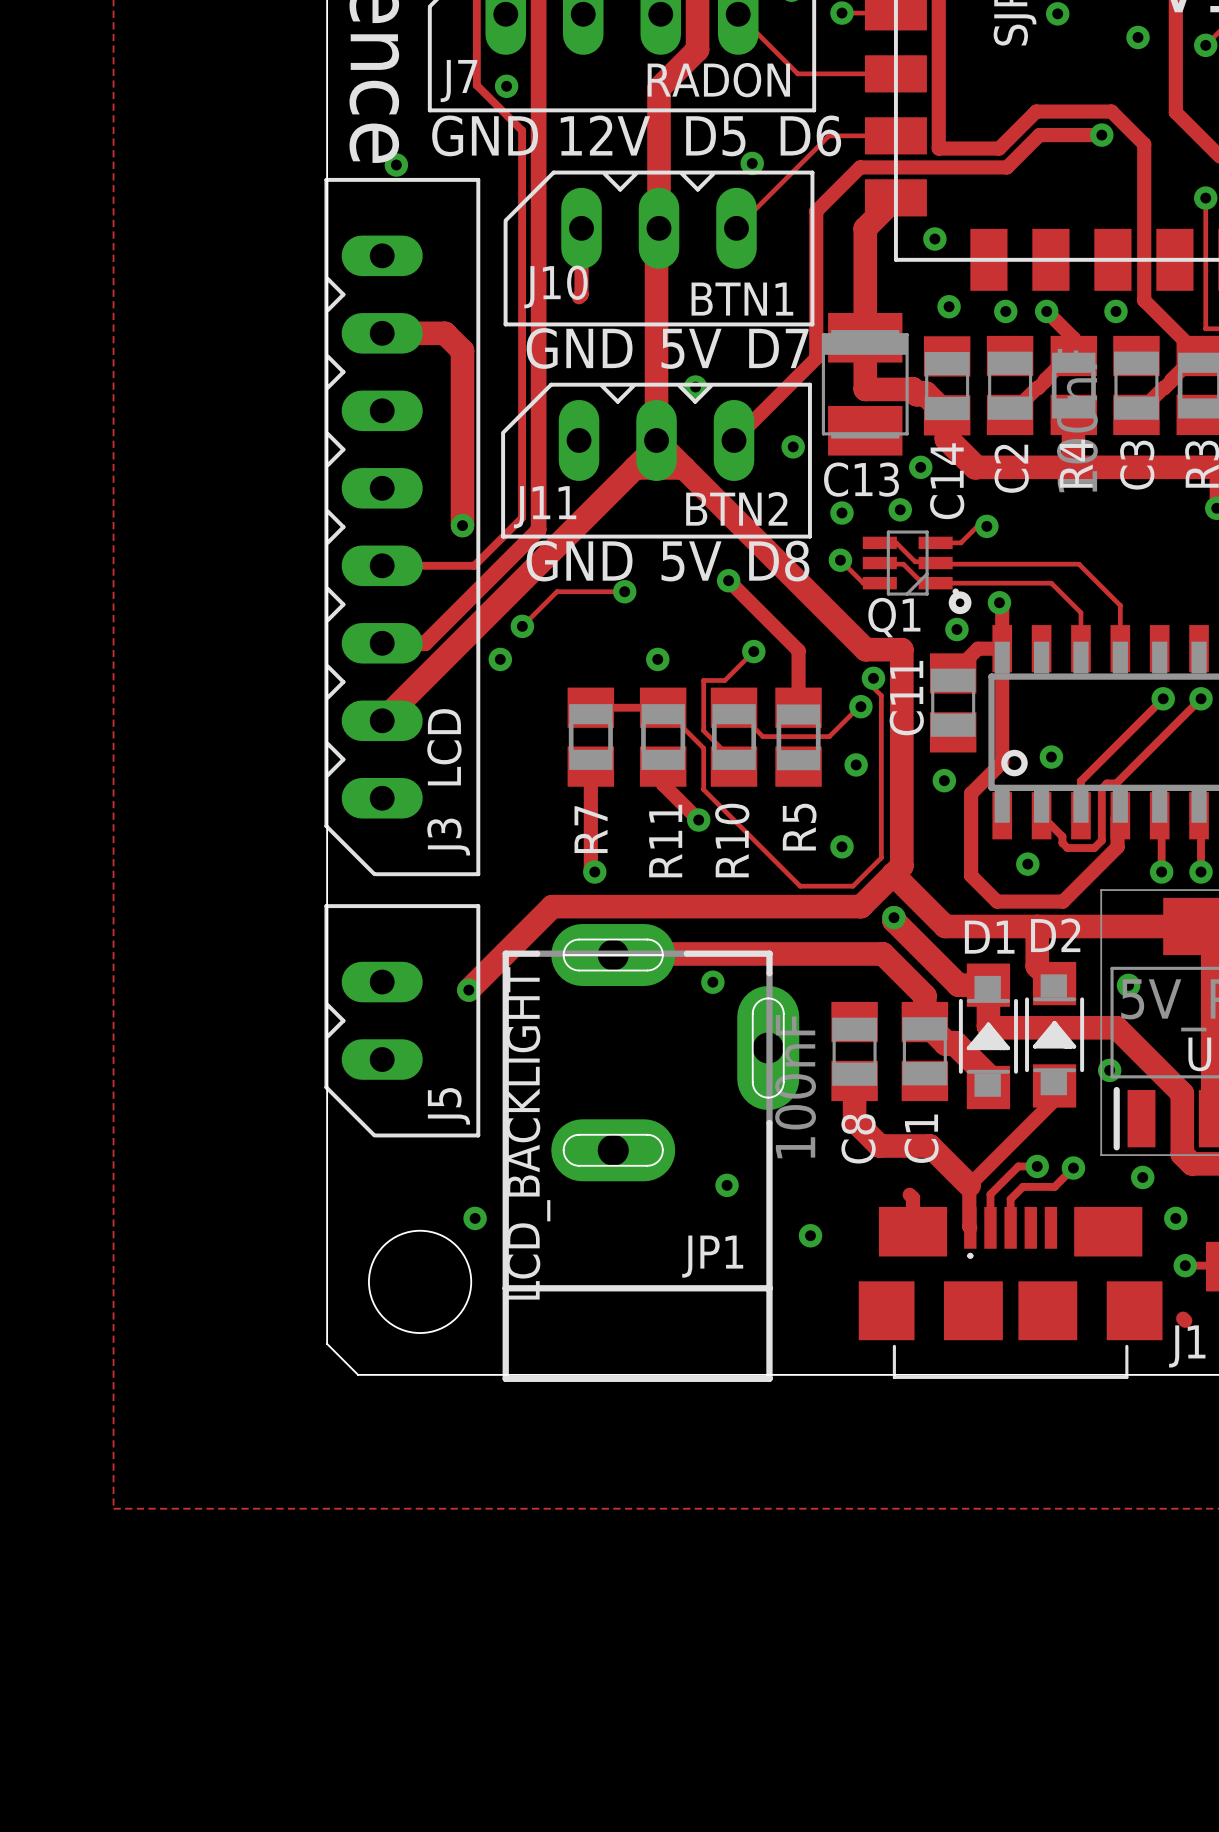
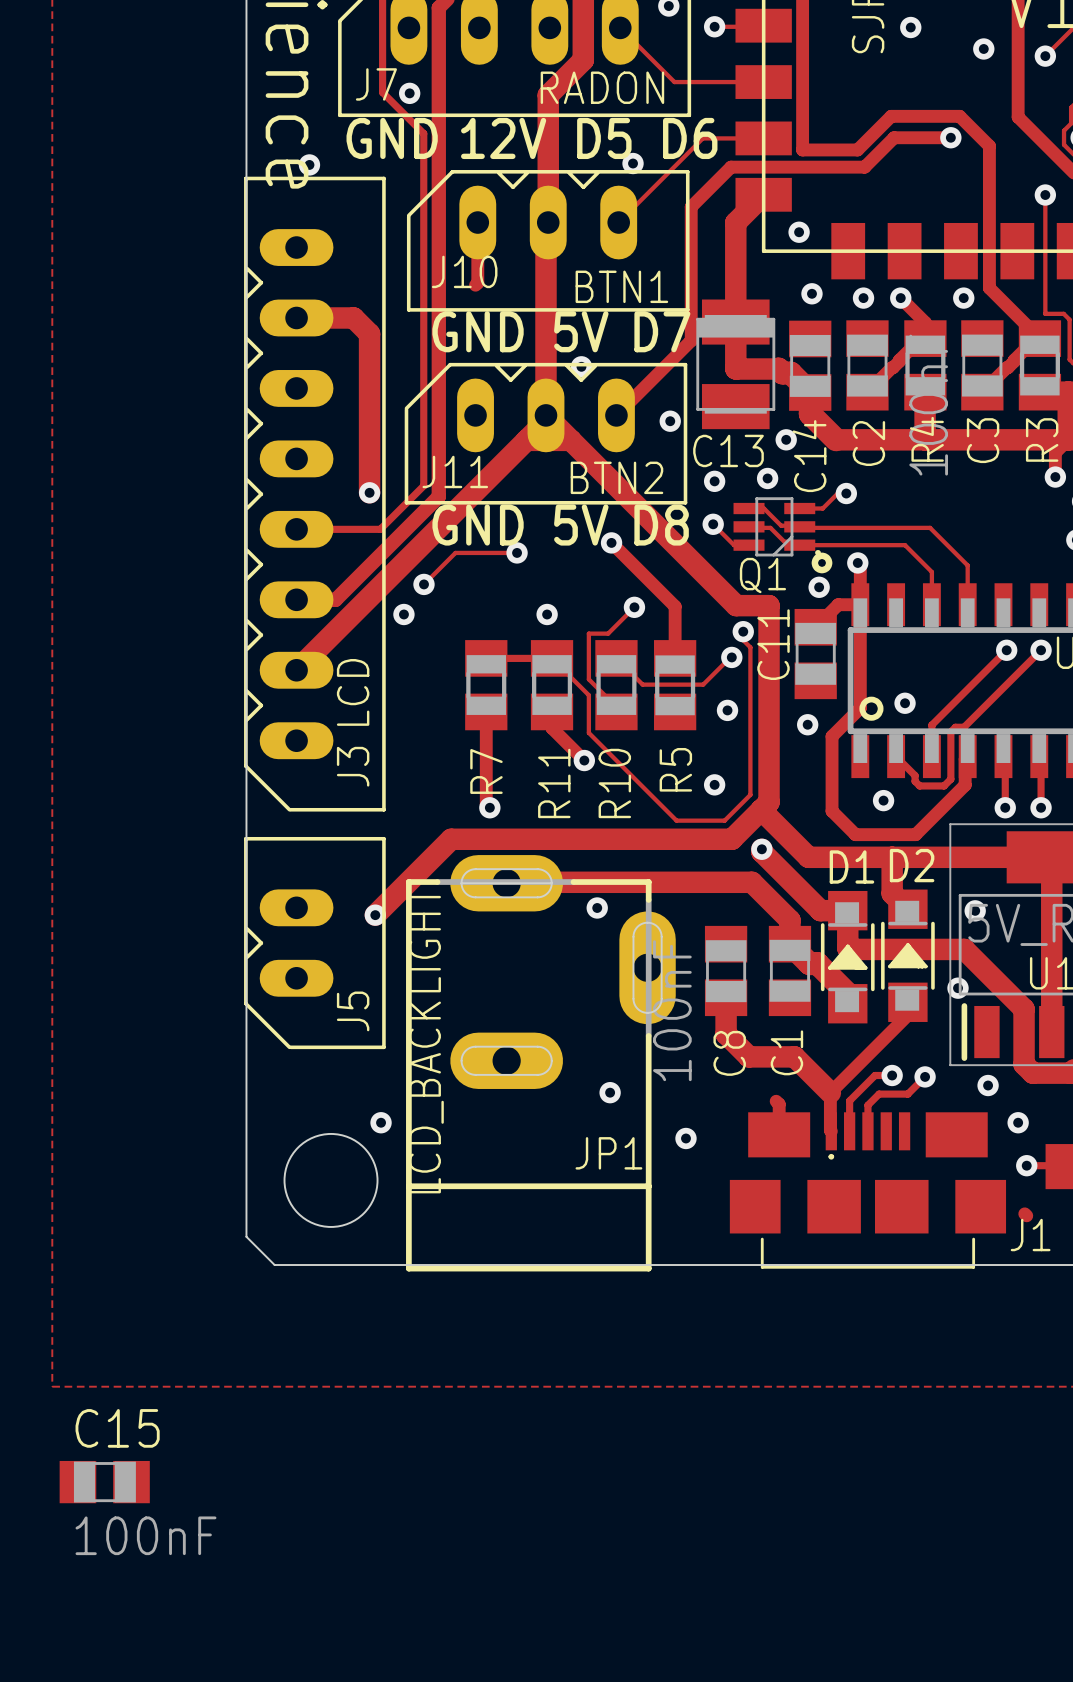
C15: none -> 100nF (104, 1482)

